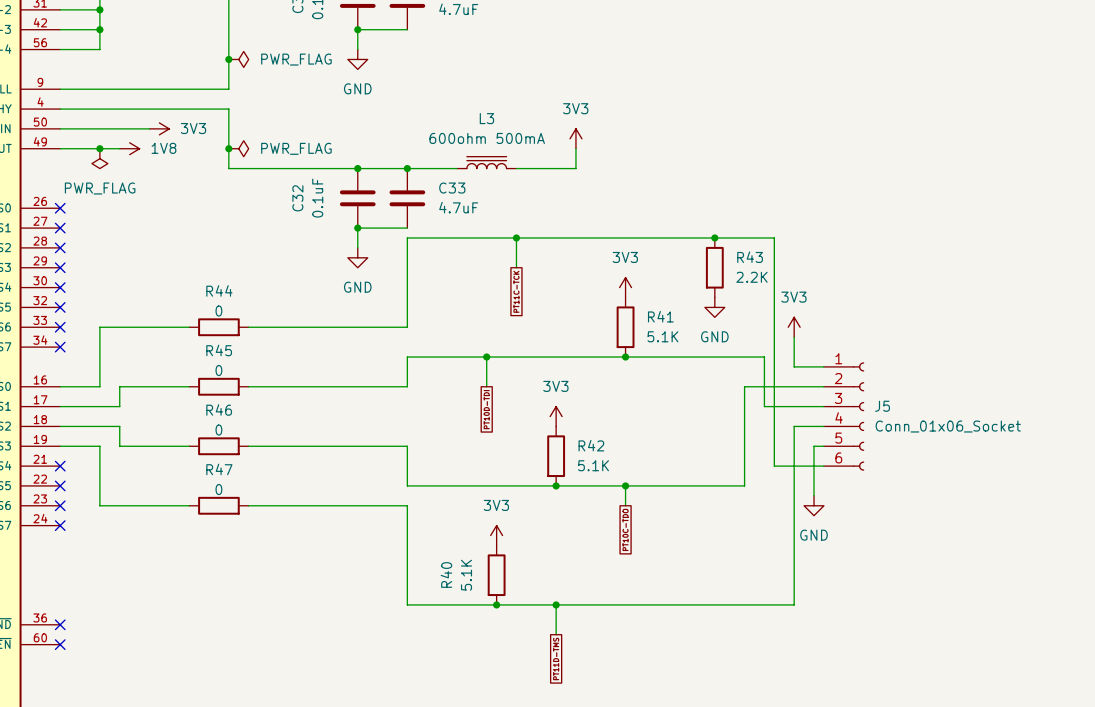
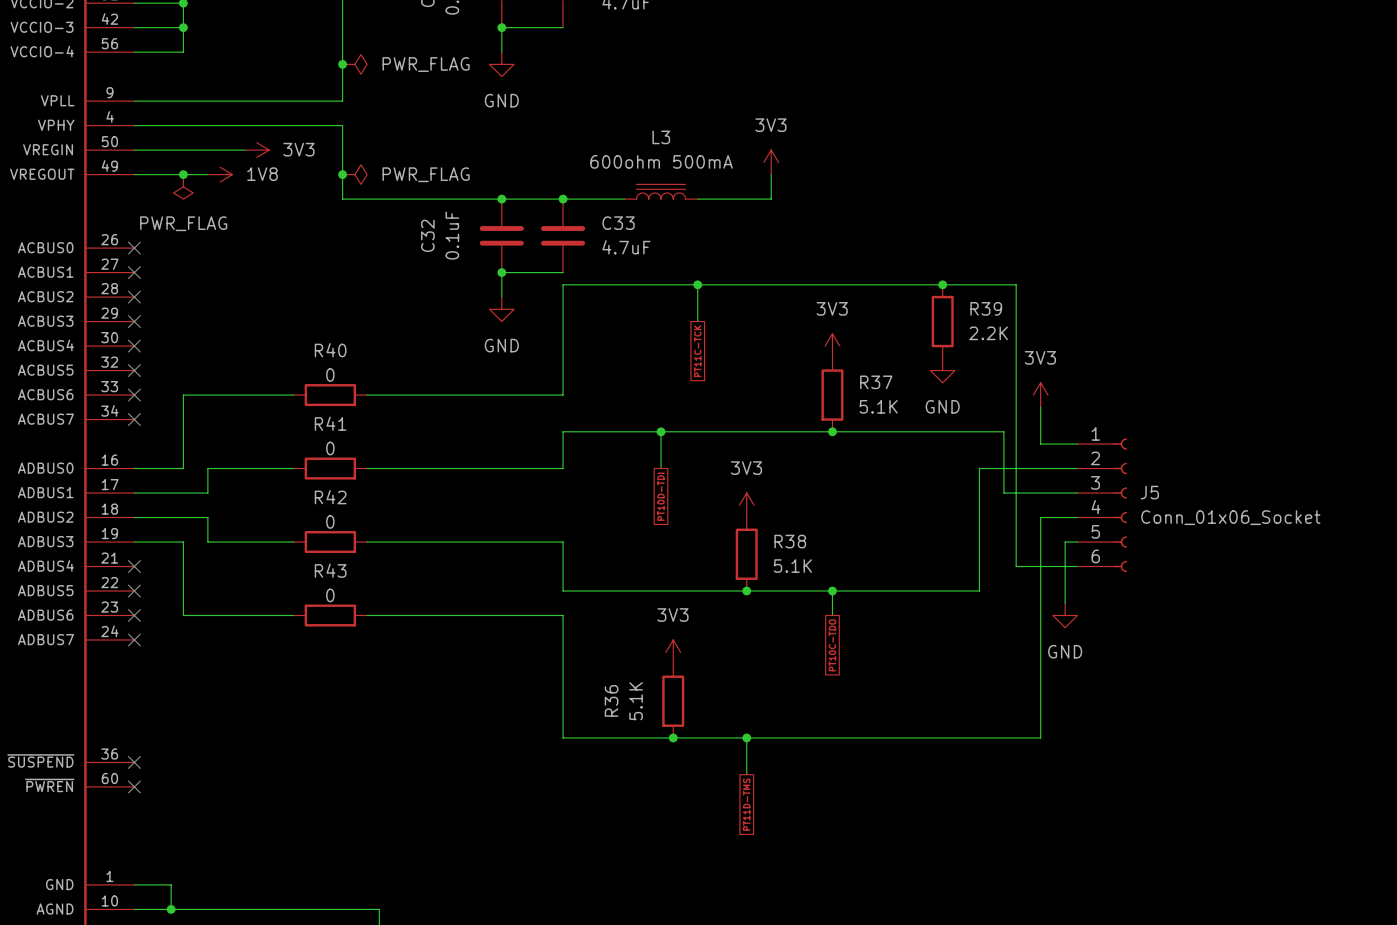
R43 name: R43 (750, 257) -> R39 (986, 308)
R44 name: R44 (219, 290) -> R40 (330, 350)
R41 name: R41 (660, 316) -> R37 (876, 382)
R45 name: R45 (219, 350) -> R41 (330, 423)
R46 name: R46 (219, 409) -> R42 (330, 497)
R42 name: R42 (591, 445) -> R38 (790, 541)
R47 name: R47 (219, 469) -> R43 (330, 570)
R40 name: R40 (446, 574) -> R36 (611, 700)

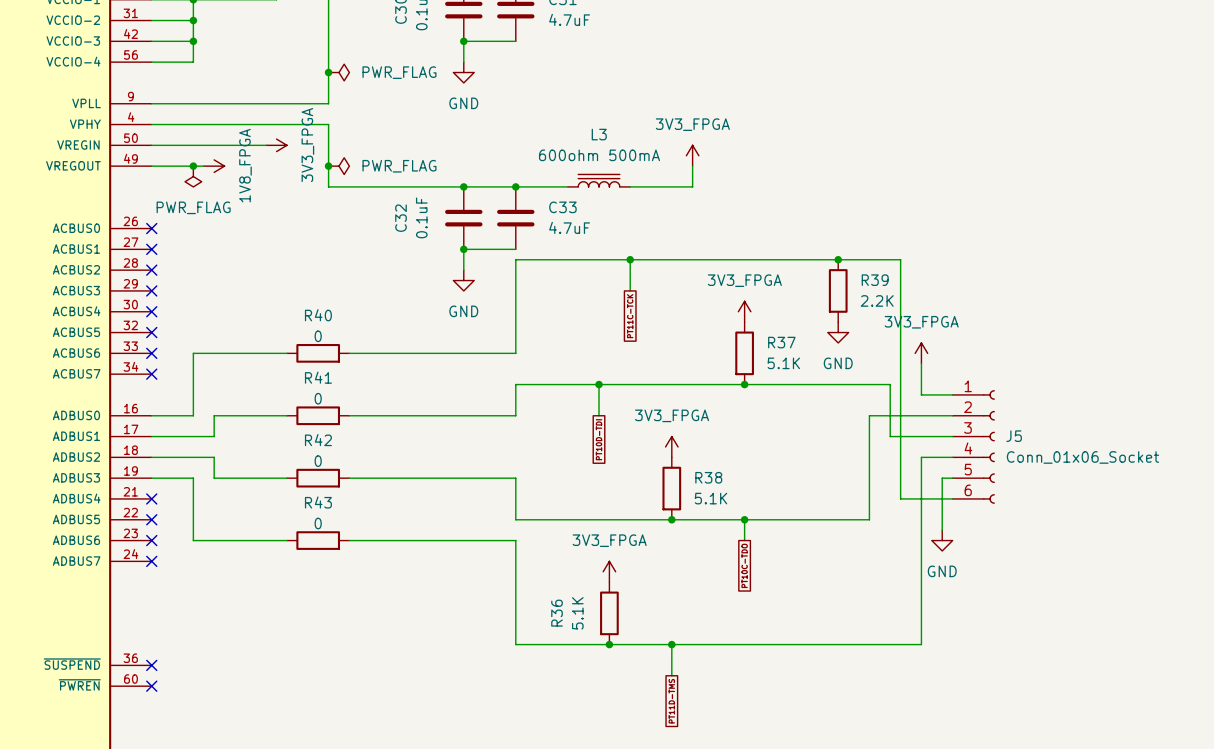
power symbol: 3V3 (256, 150) -> none
power symbol: none -> 3V3_FPGA (276, 145)
power symbol: 3V3 (771, 162) -> 3V3_FPGA (692, 155)
power symbol: none -> 1V8_FPGA (214, 166)
power symbol: 1V8 (220, 174) -> none
power symbol: 3V3 (832, 346) -> 3V3_FPGA (744, 311)
power symbol: 3V3 (1040, 395) -> 3V3_FPGA (921, 353)
power symbol: 3V3 (746, 505) -> 3V3_FPGA (671, 446)
power symbol: 3V3 (673, 652) -> 3V3_FPGA (609, 571)

